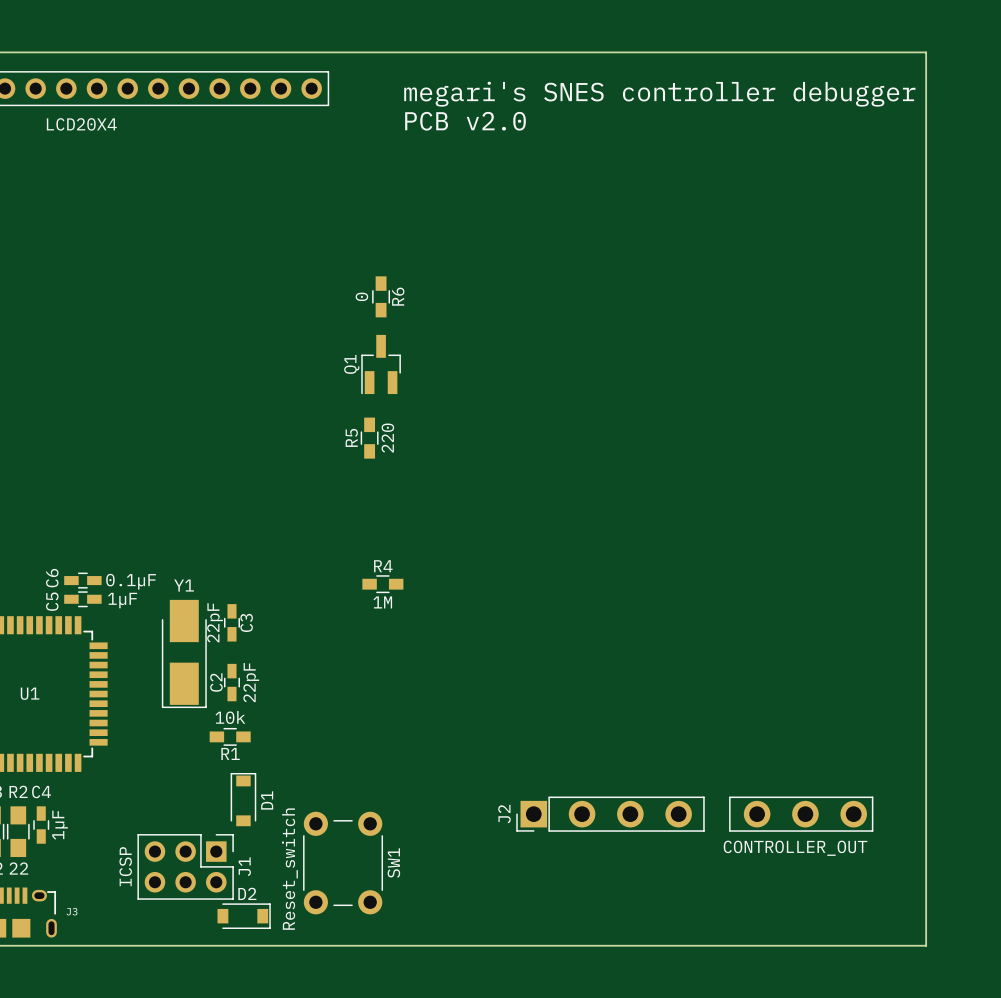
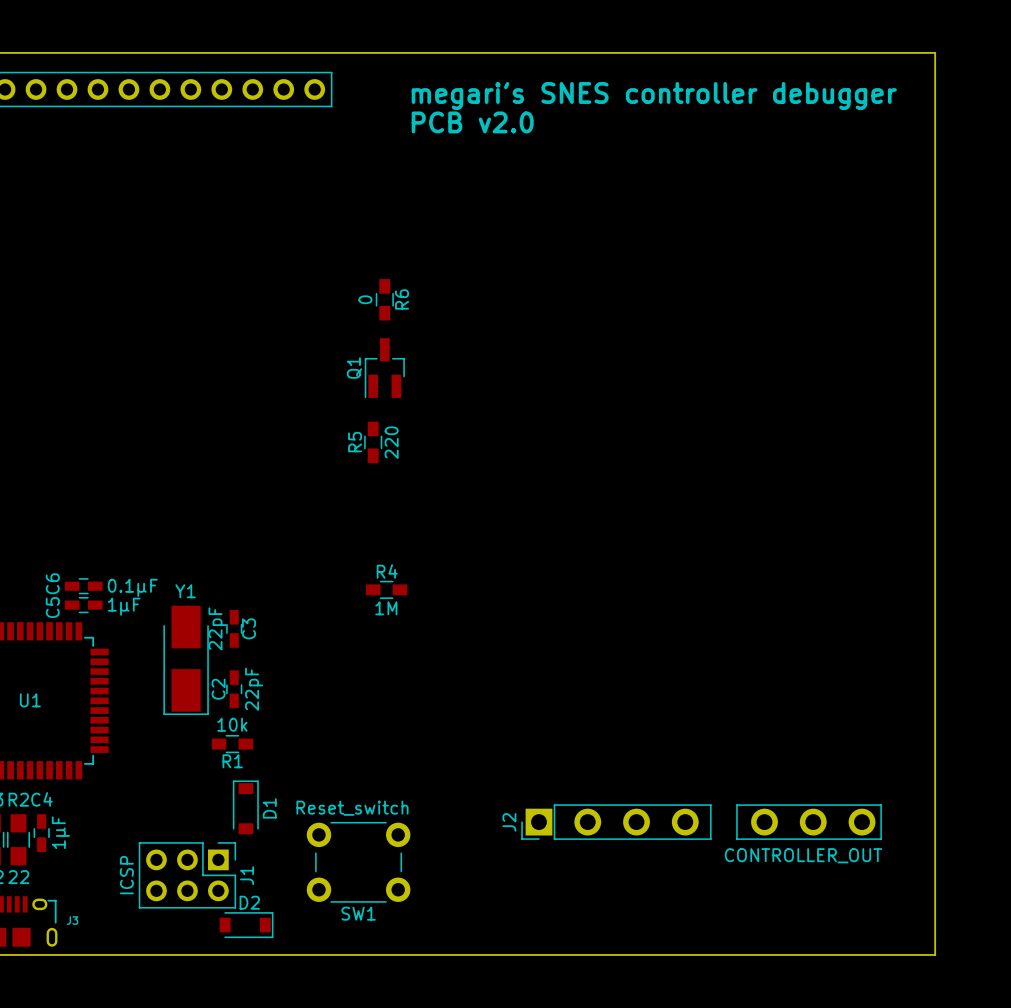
part value: LCD20X4 (81, 124) -> none
SW1 rotation: 0° (343, 863) -> 90° clockwise (358, 862)

